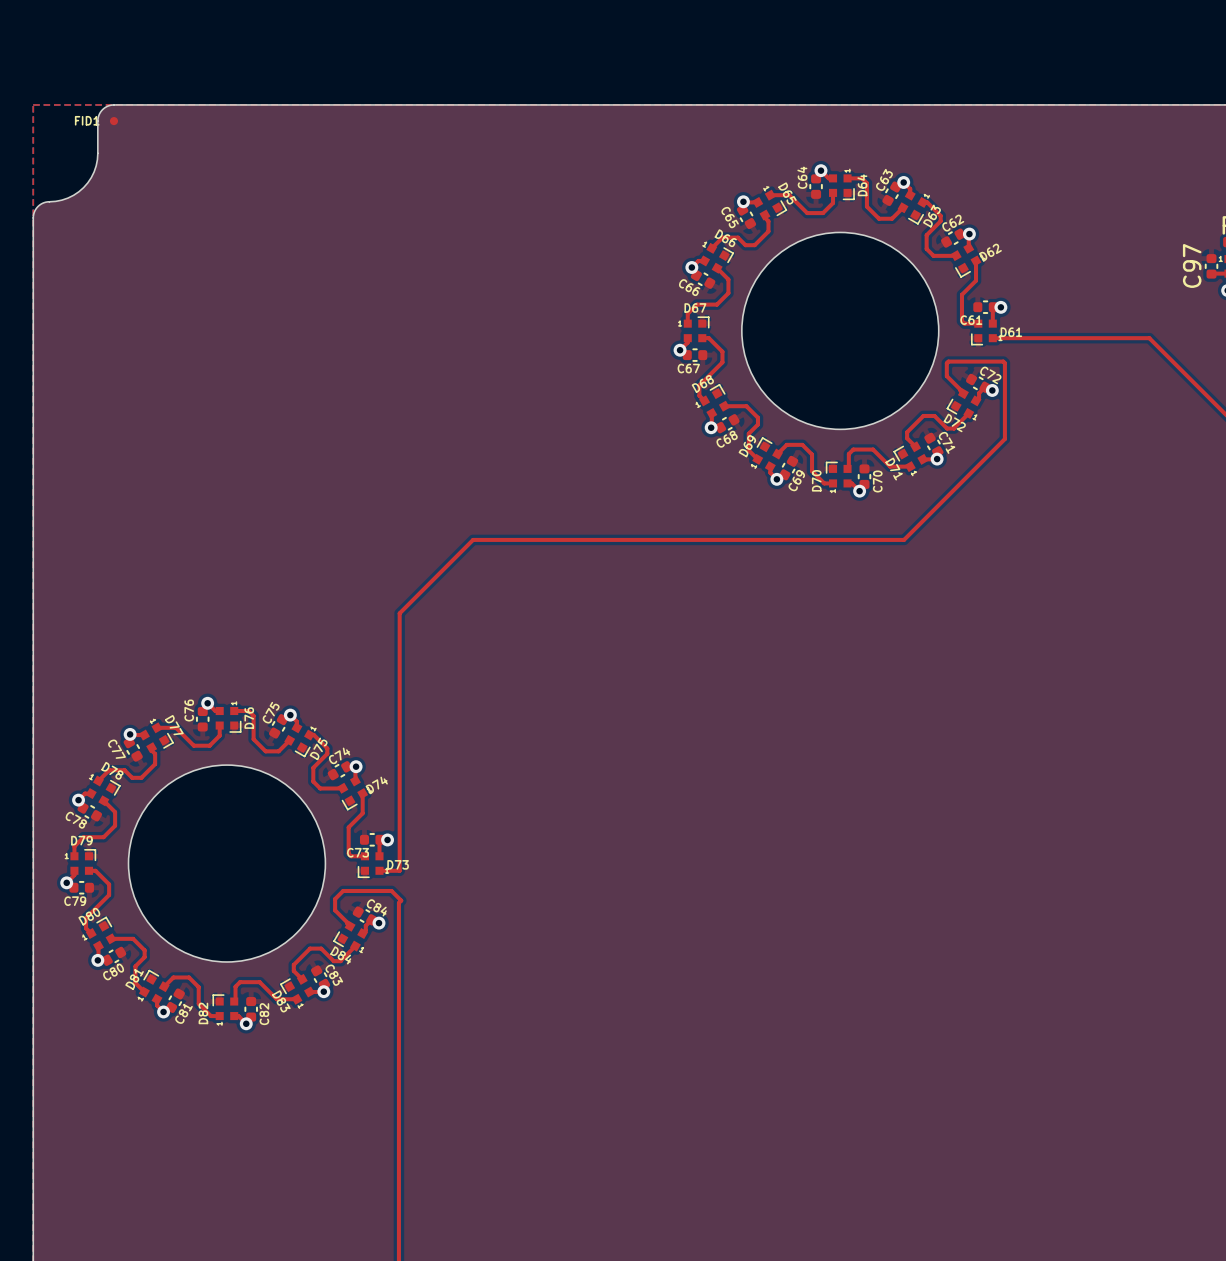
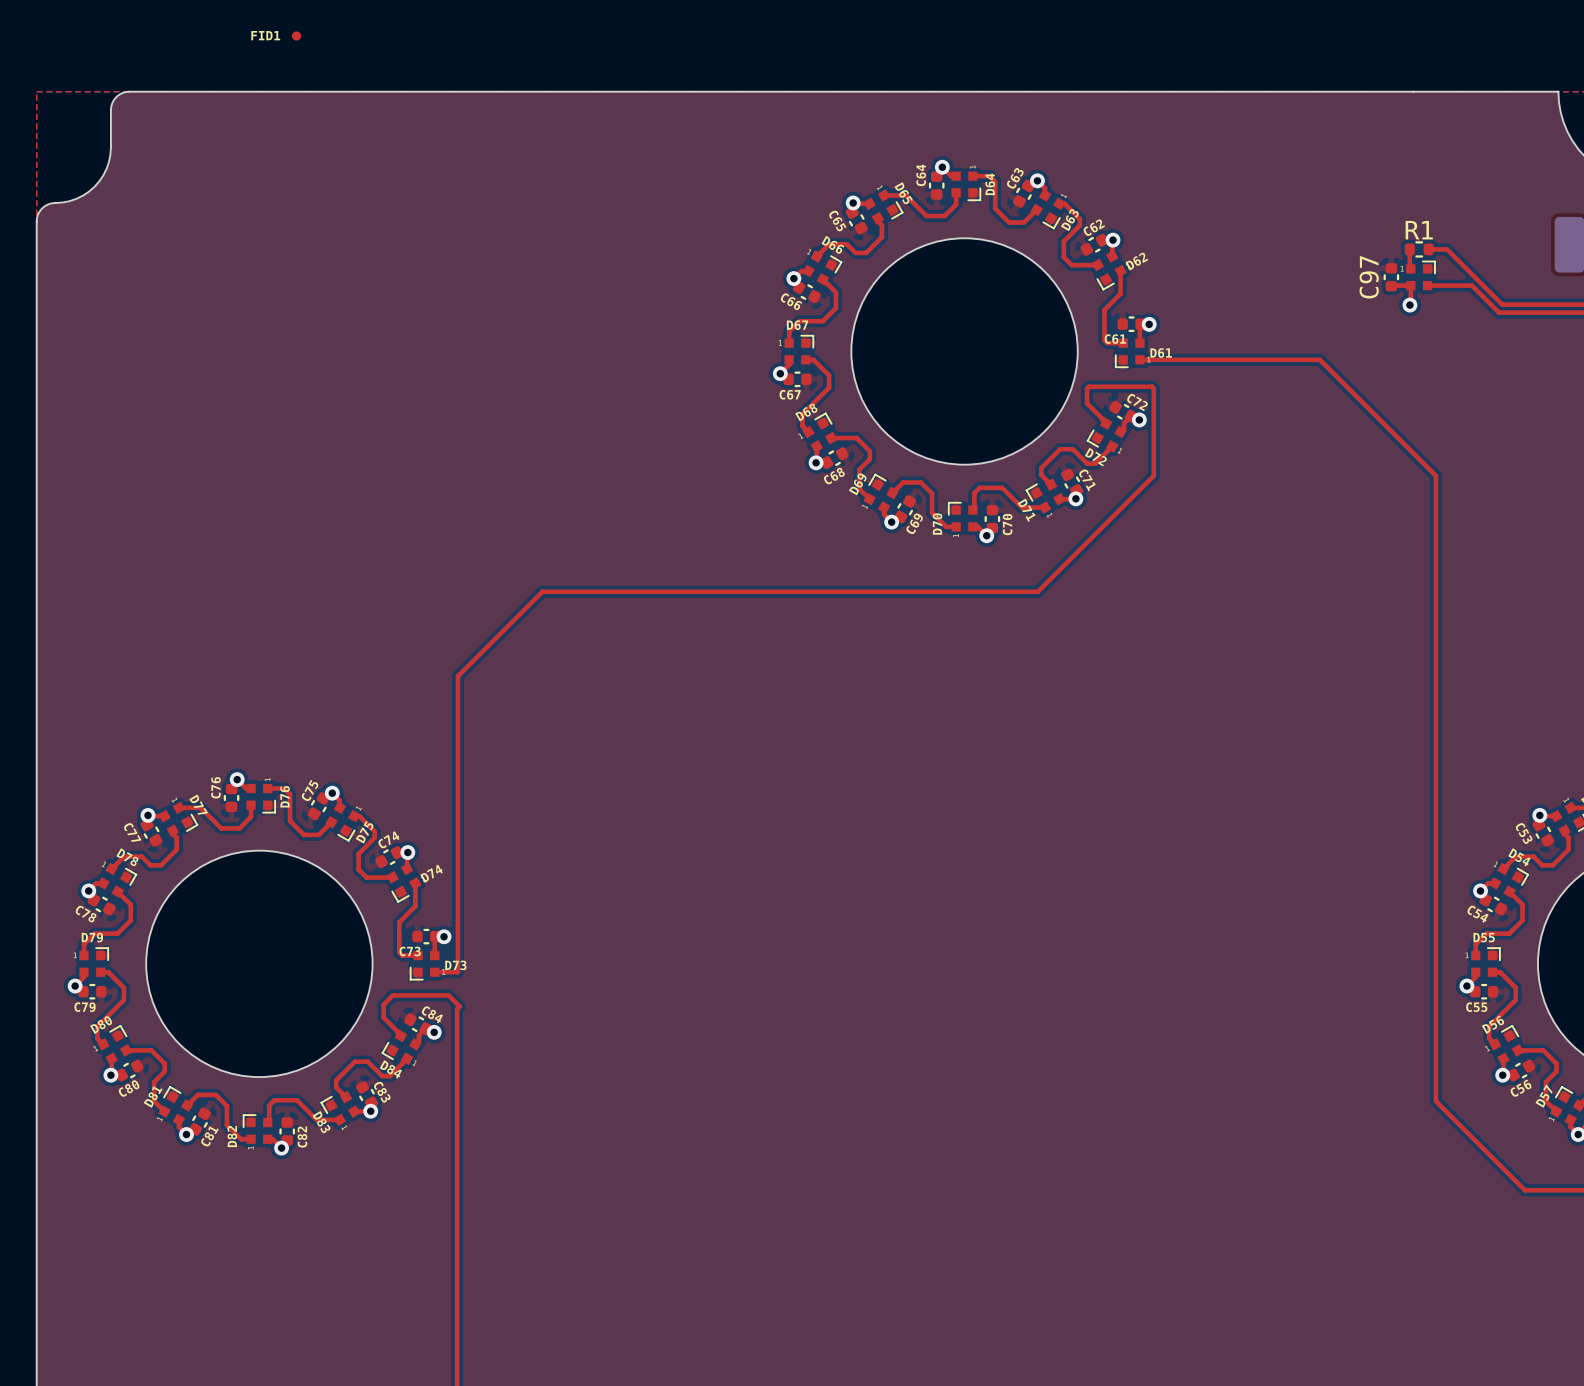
FID1 position: (113, 121) -> (296, 36)

